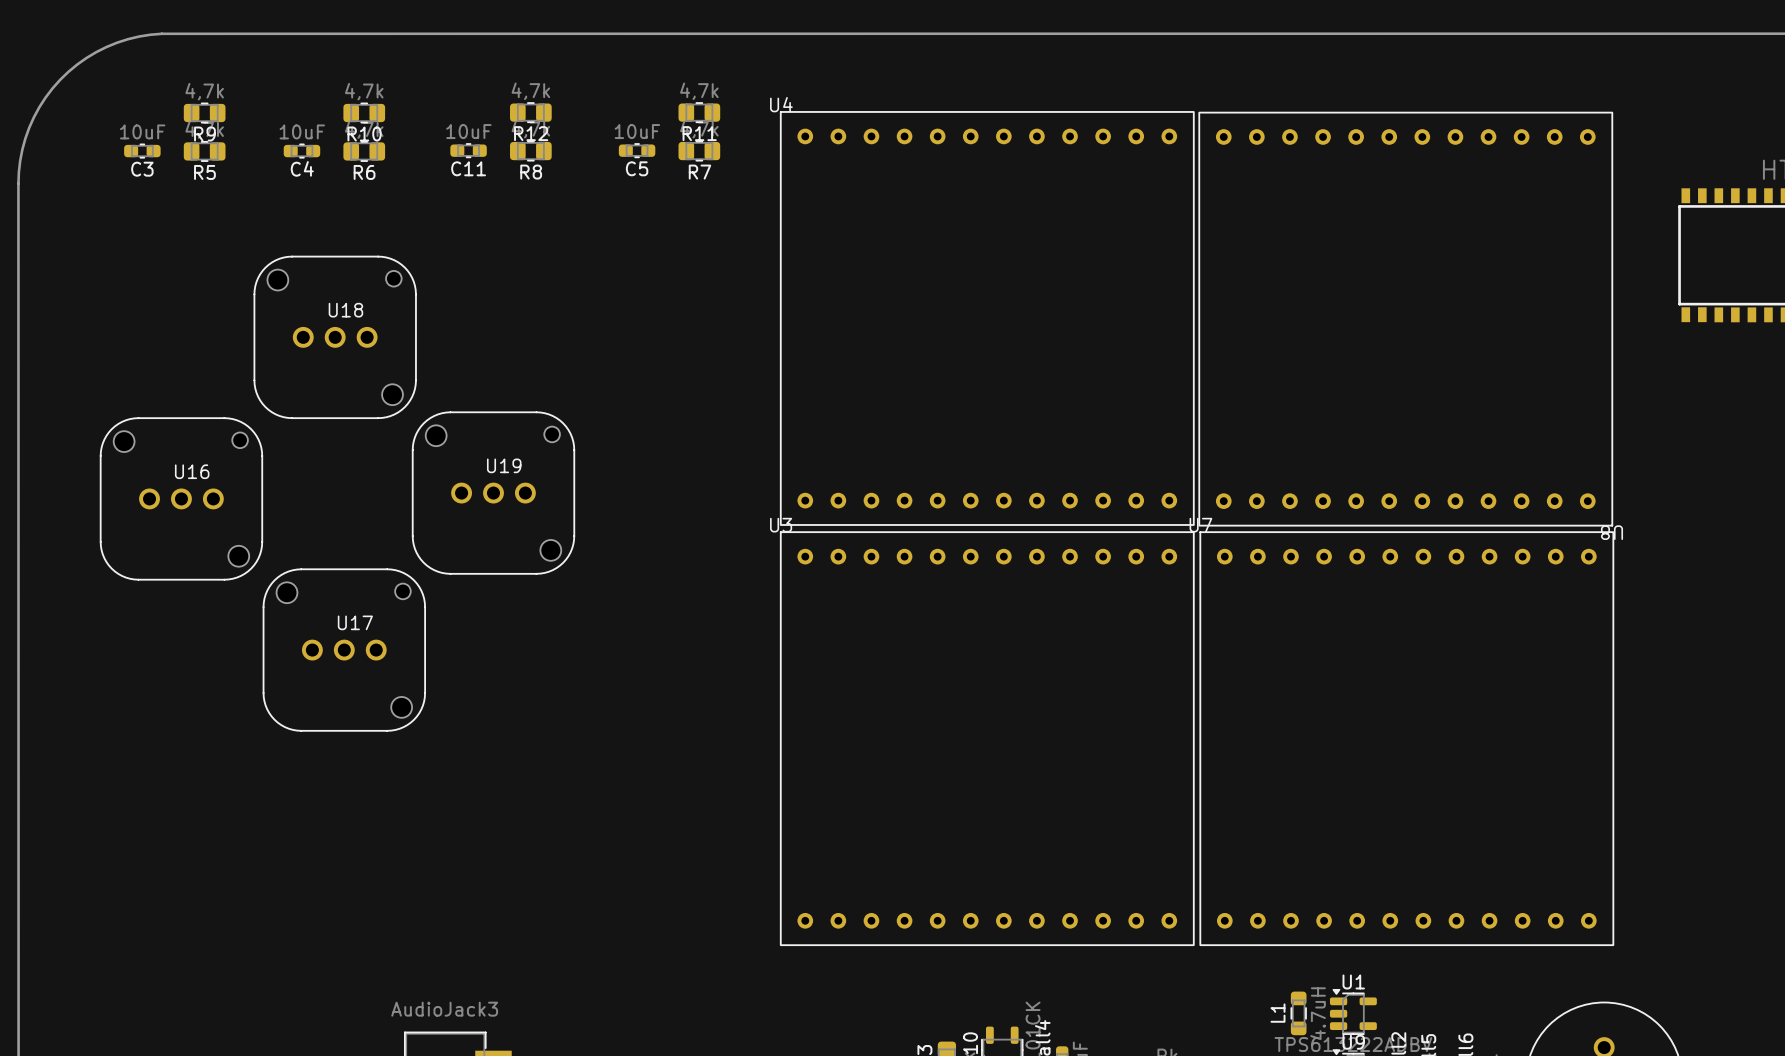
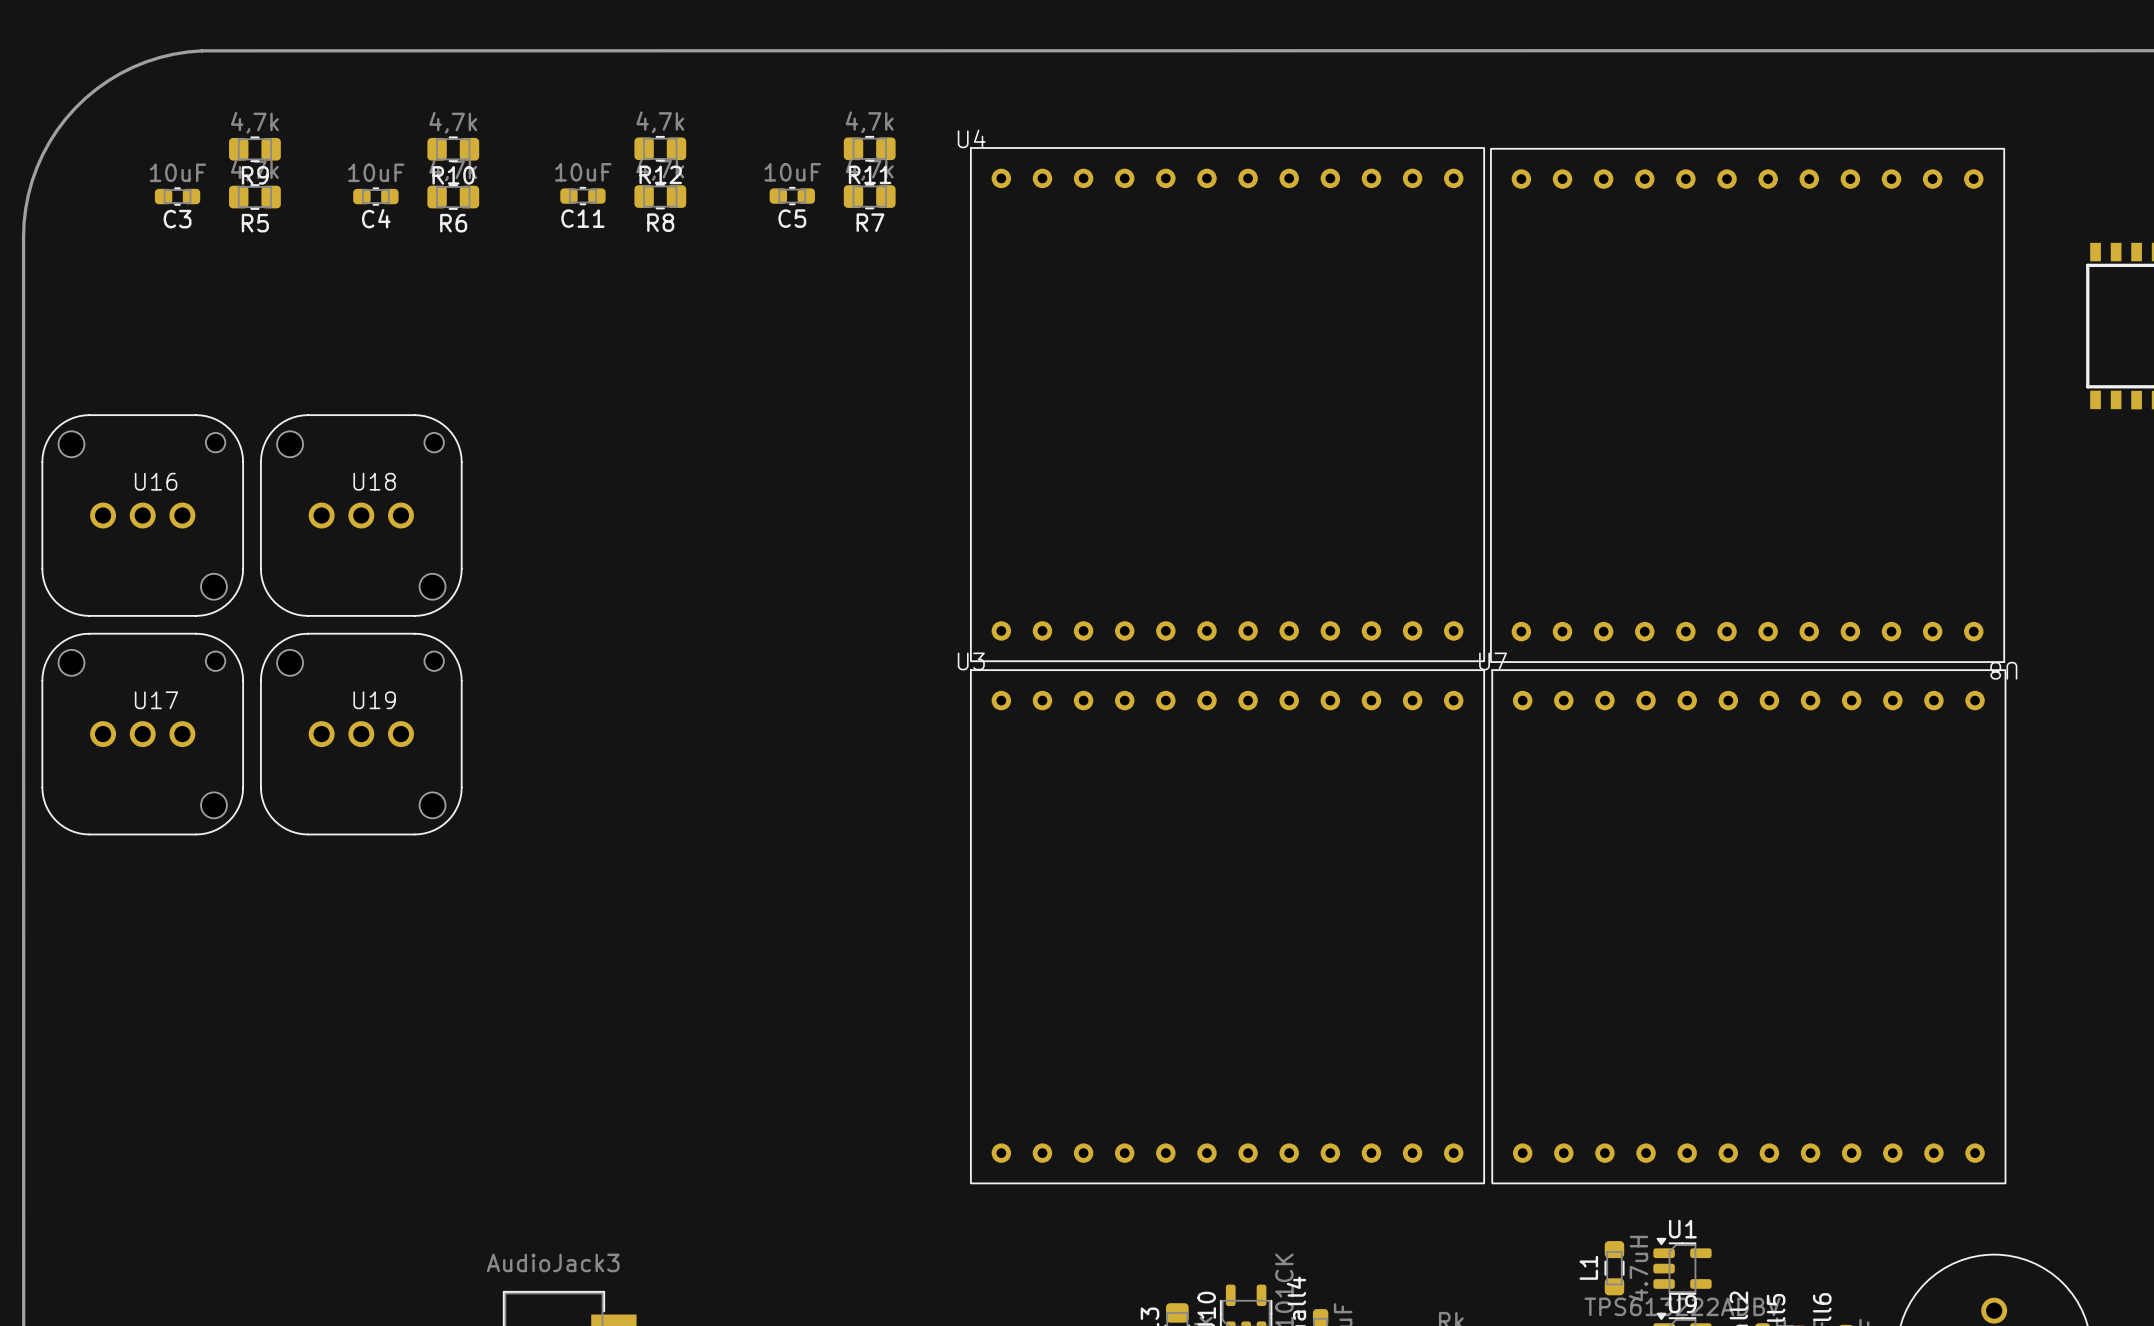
U18 position: (335, 337) -> (361, 515)
U19 position: (493, 493) -> (361, 734)
U16 position: (181, 498) -> (142, 515)
U17 position: (344, 650) -> (142, 734)

